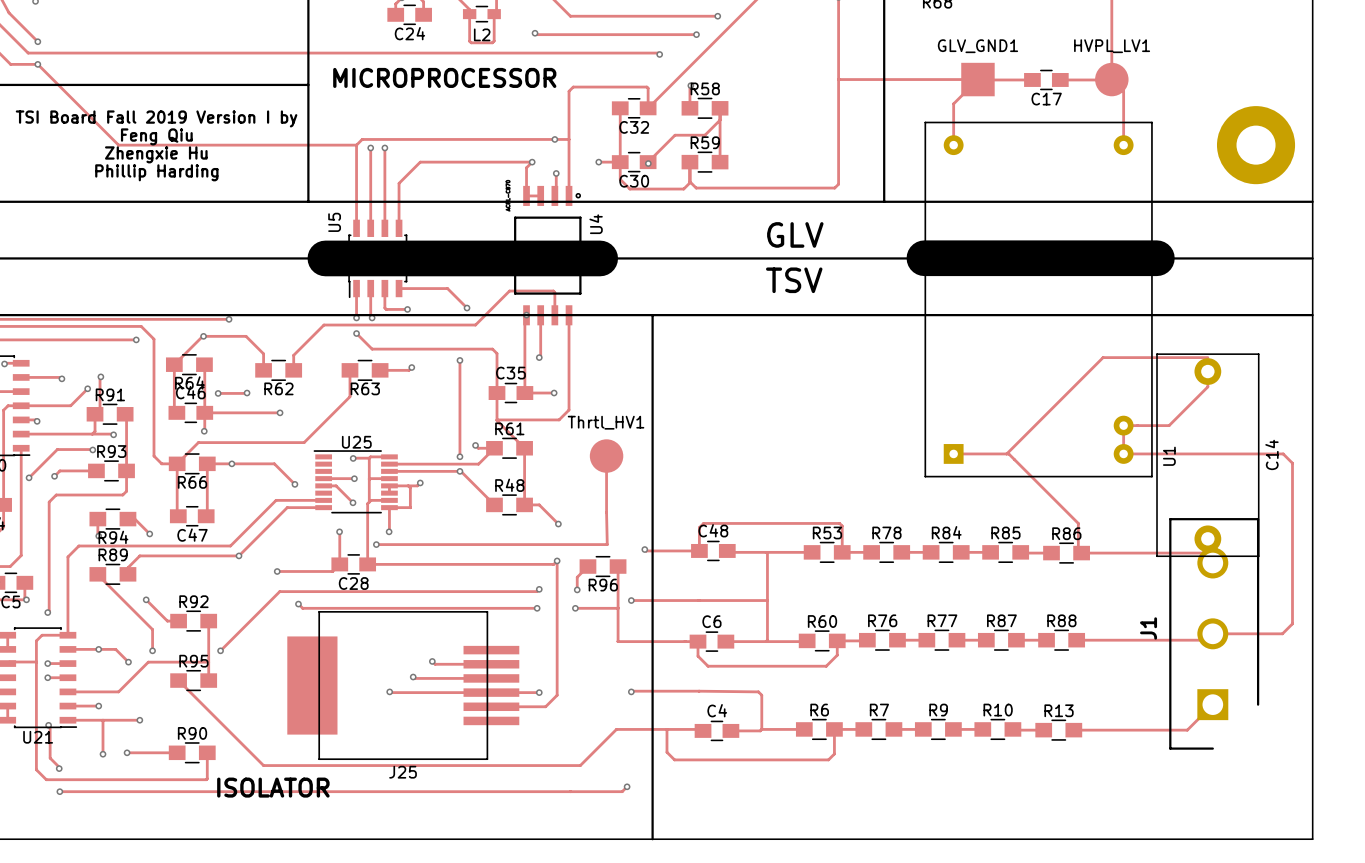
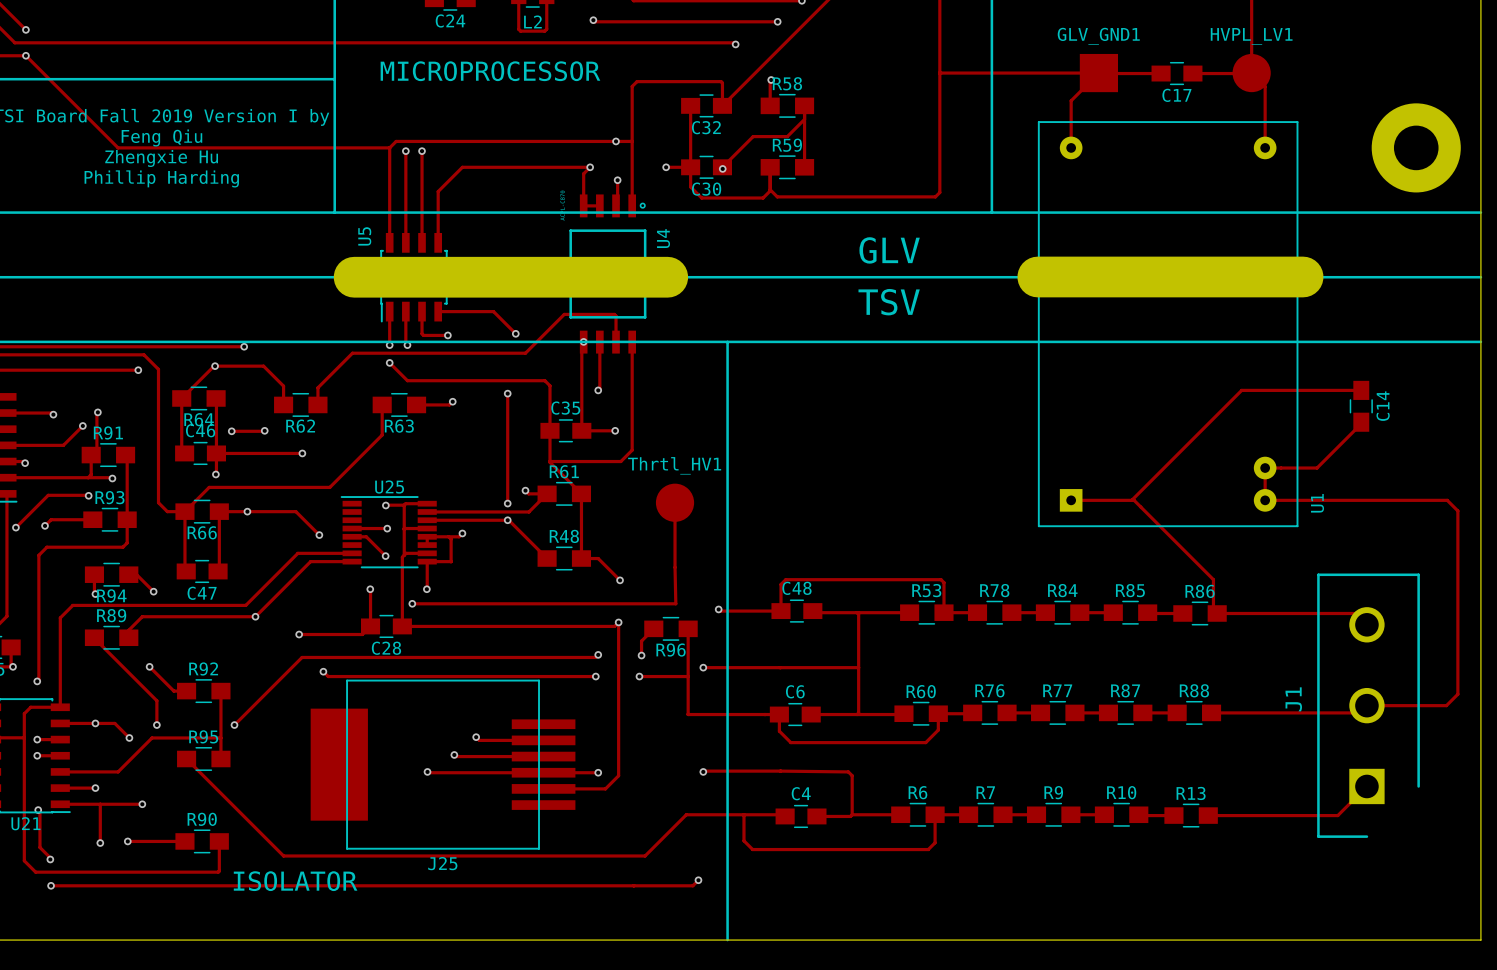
C14 footprint: [1156, 353, 1260, 557] -> [1349, 380, 1373, 432]
C14 name position: C14 (1271, 454) -> C14 (1383, 406)

